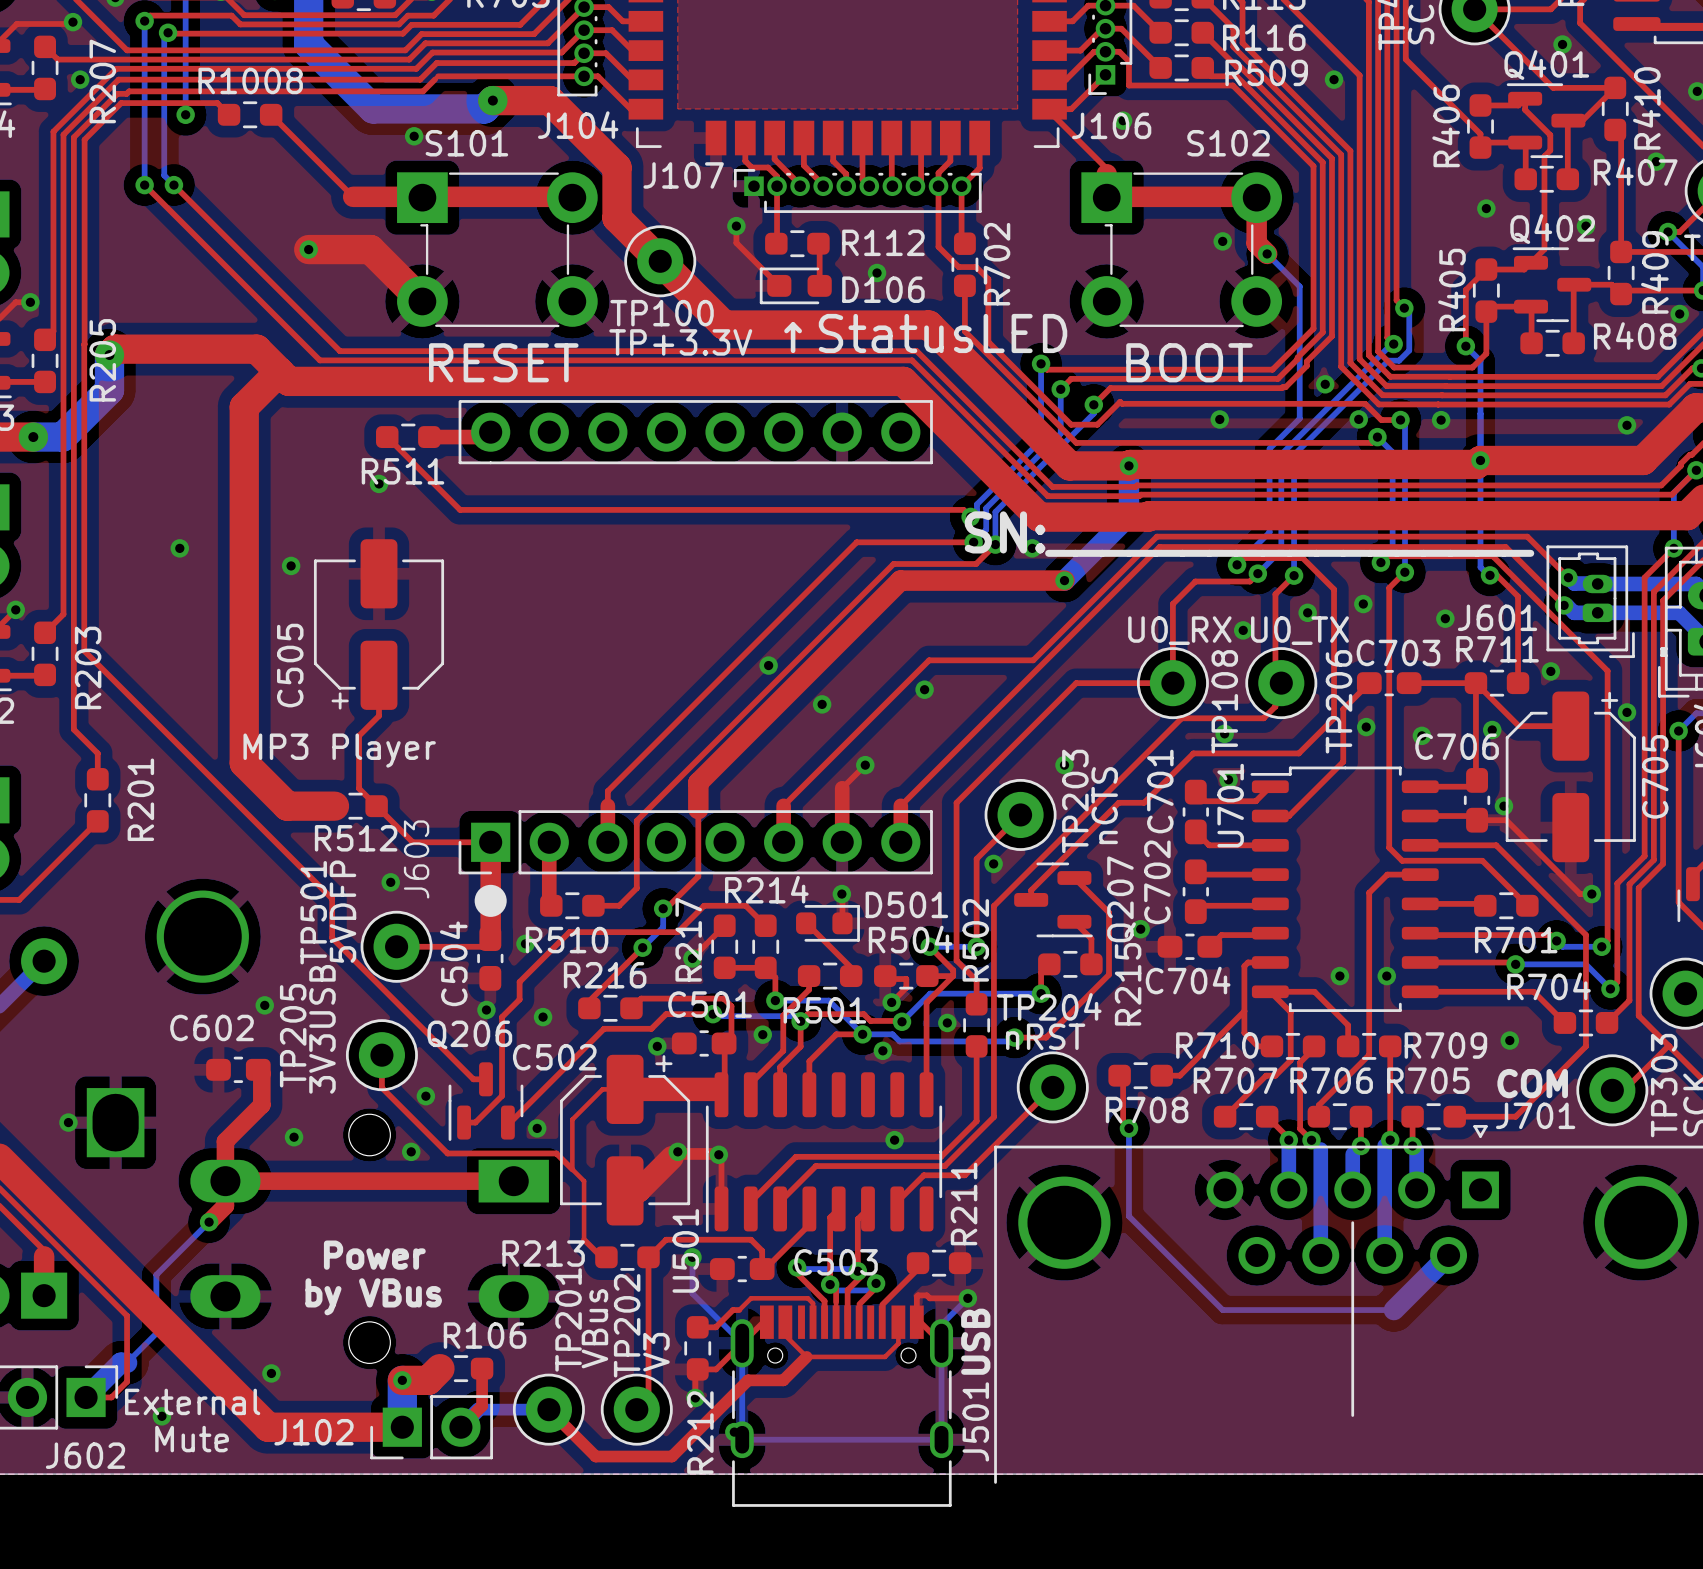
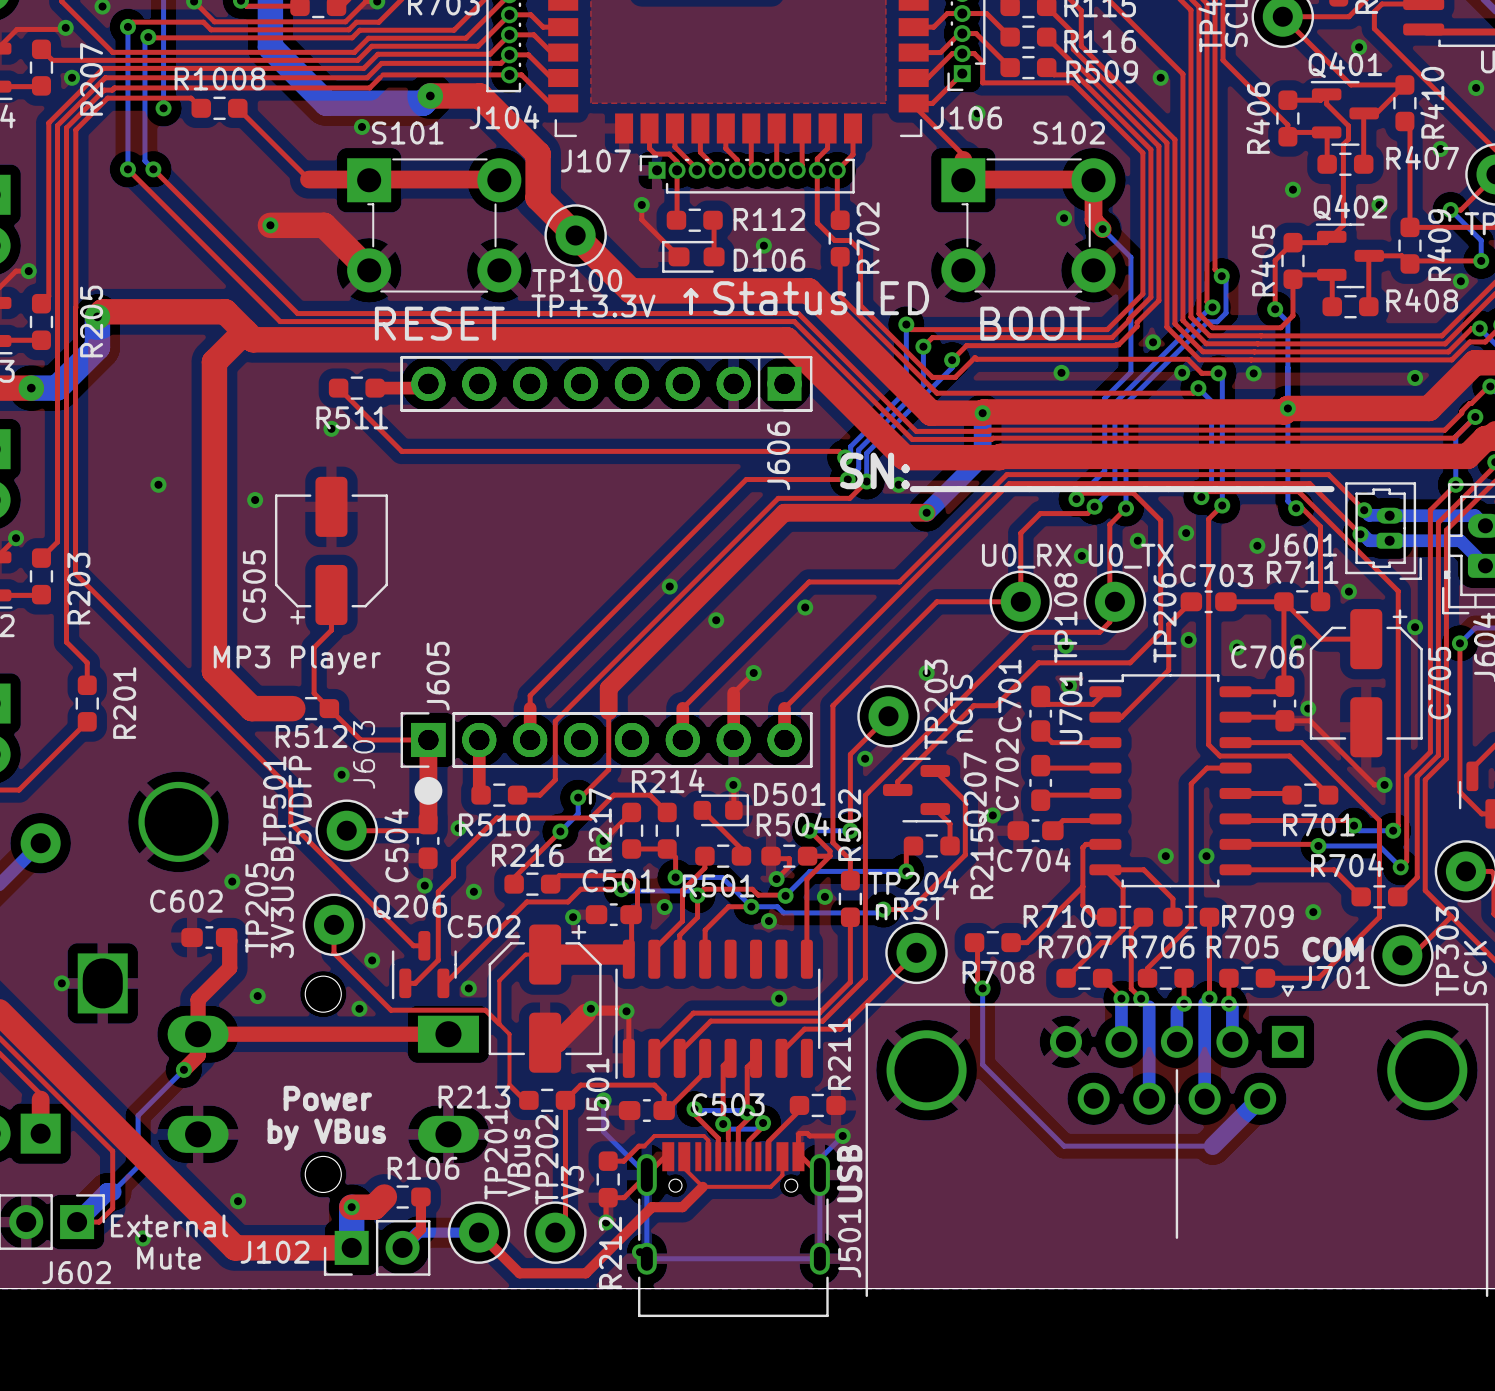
J606: none -> (606, 383)
J605: none -> (606, 739)

